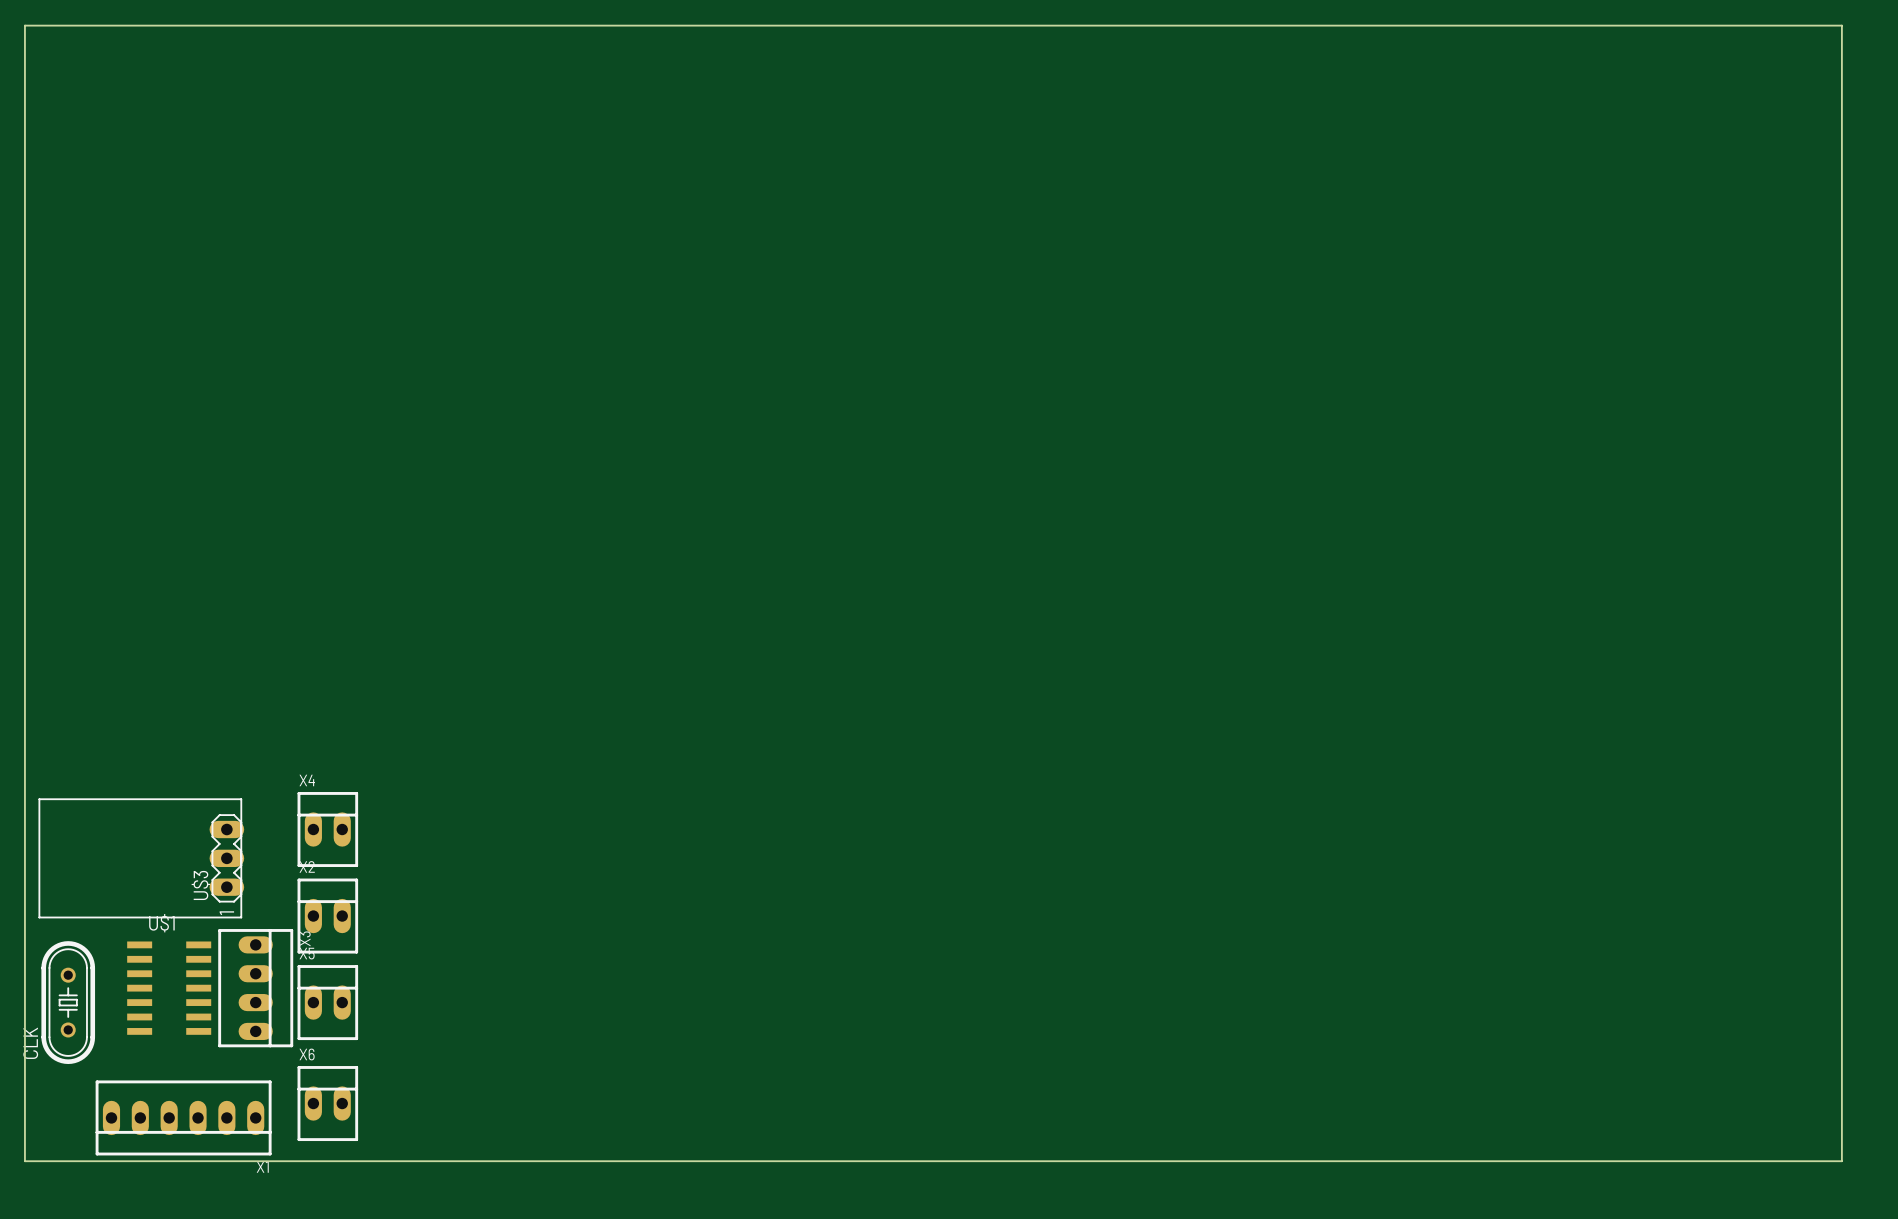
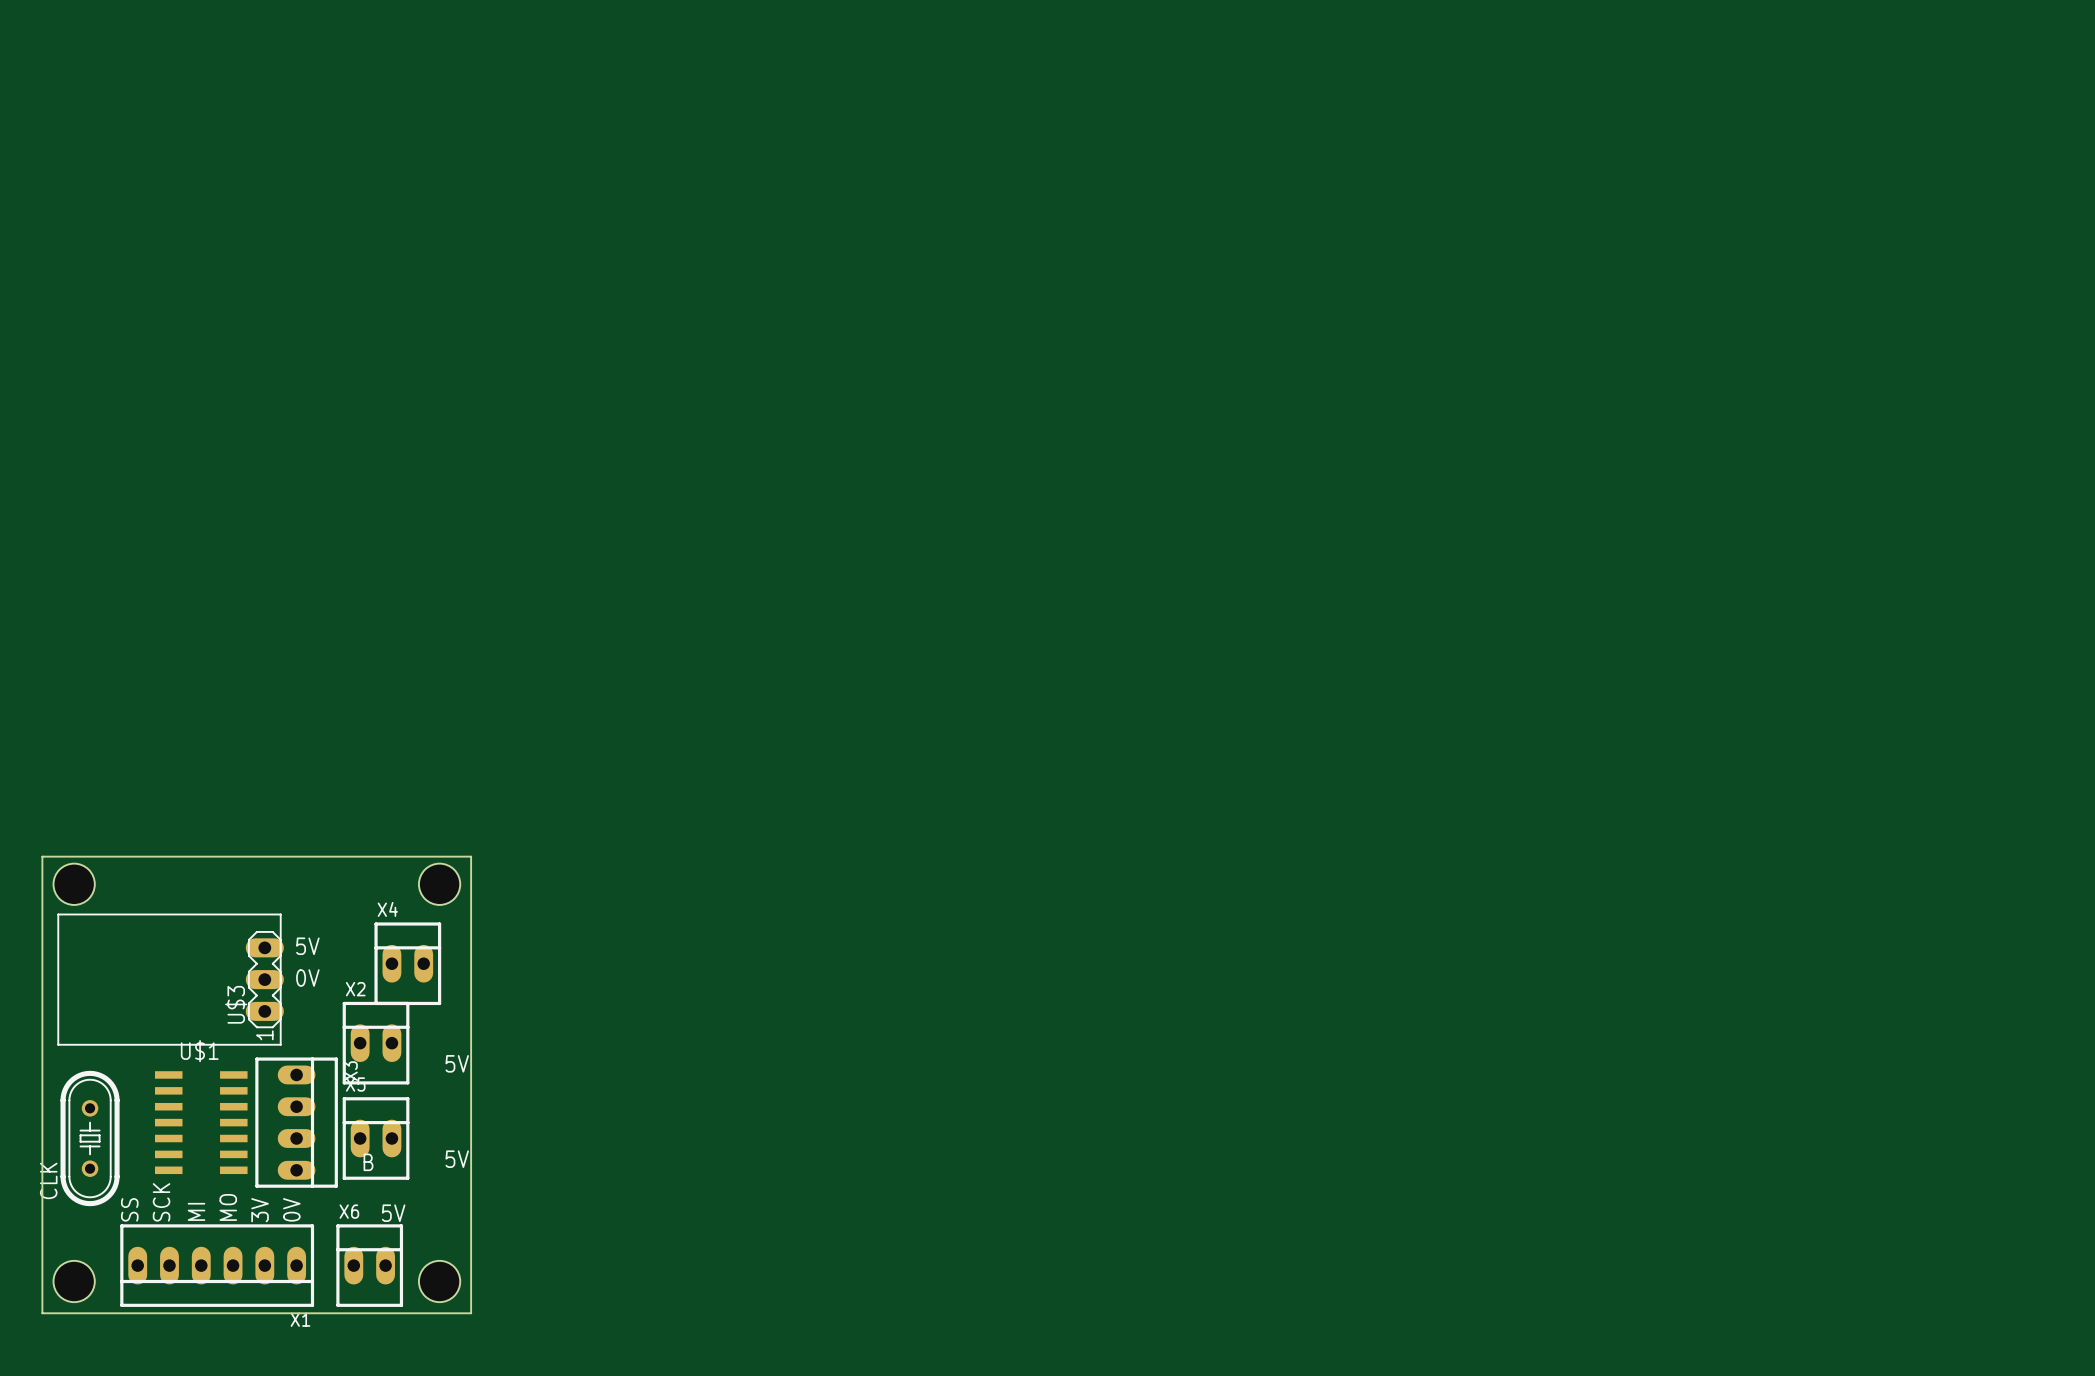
board edge: (24, 746) (24, 25) (1841, 25) (1841, 1161) (414, 1161) -> (42, 856) (471, 856) (471, 1313)
hole: none -> (74, 884)
hole: none -> (439, 884)
text: none -> 5V (307, 946)
X4 position: (327, 829) -> (407, 963)
text: none -> 0V (307, 978)
text: none -> 5V (457, 1063)
text: none -> 5V (457, 1159)
text: none -> B (368, 1162)
text: none -> SCK (161, 1202)
text: none -> MO (228, 1207)
text: none -> SS (129, 1209)
text: none -> 0V (291, 1209)
text: none -> 3V (260, 1210)
text: none -> 5V (393, 1213)
text: none -> MI (196, 1211)
X6 position: (327, 1103) -> (369, 1265)
hole: none -> (74, 1281)
hole: none -> (439, 1281)

